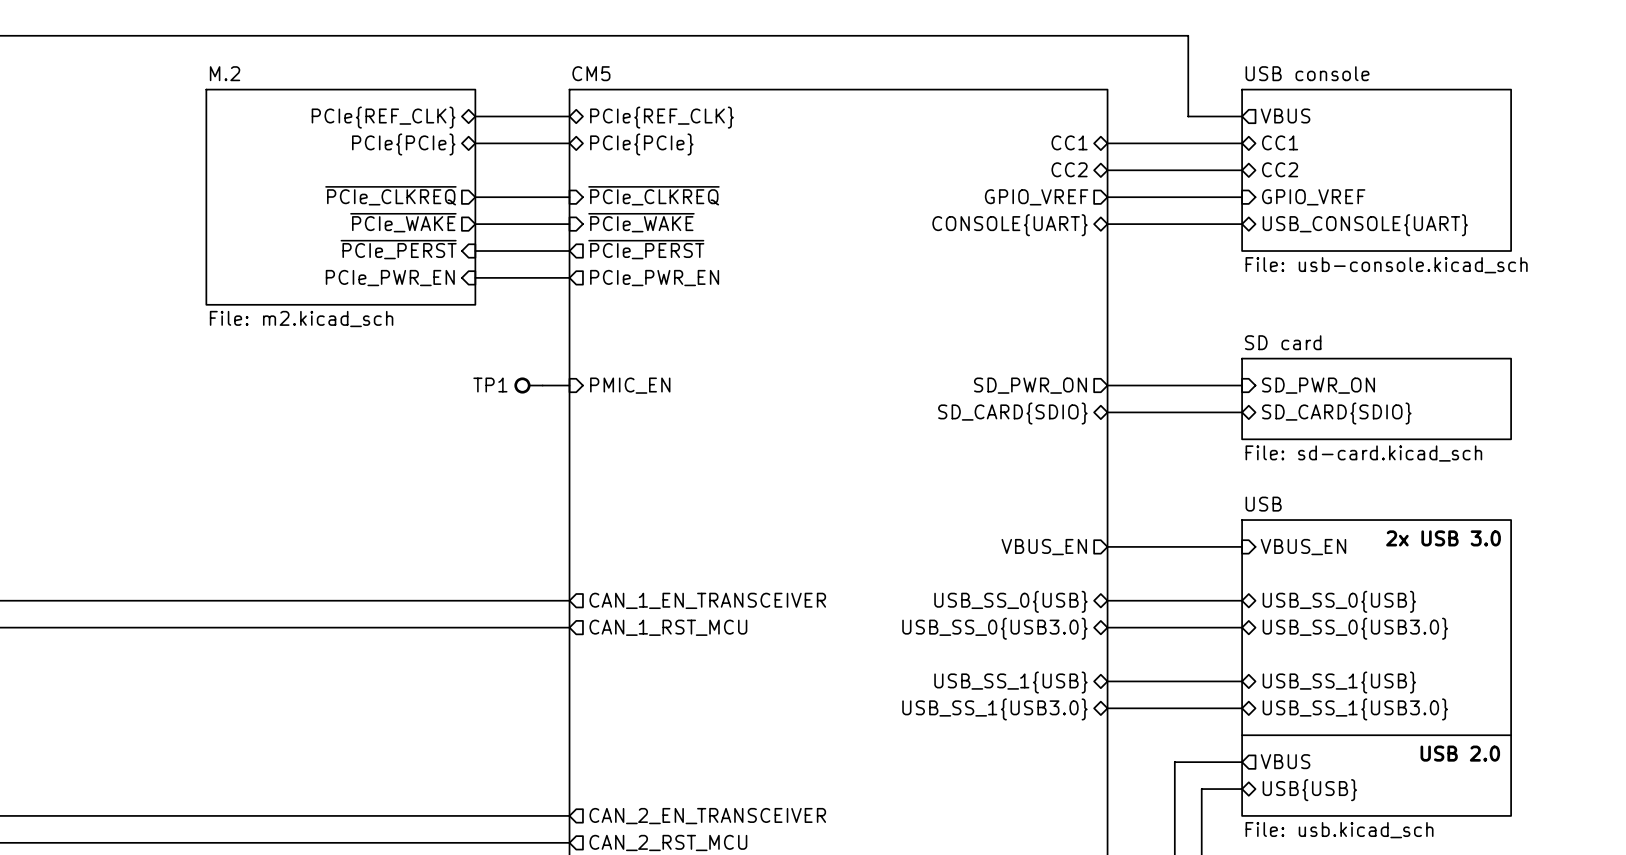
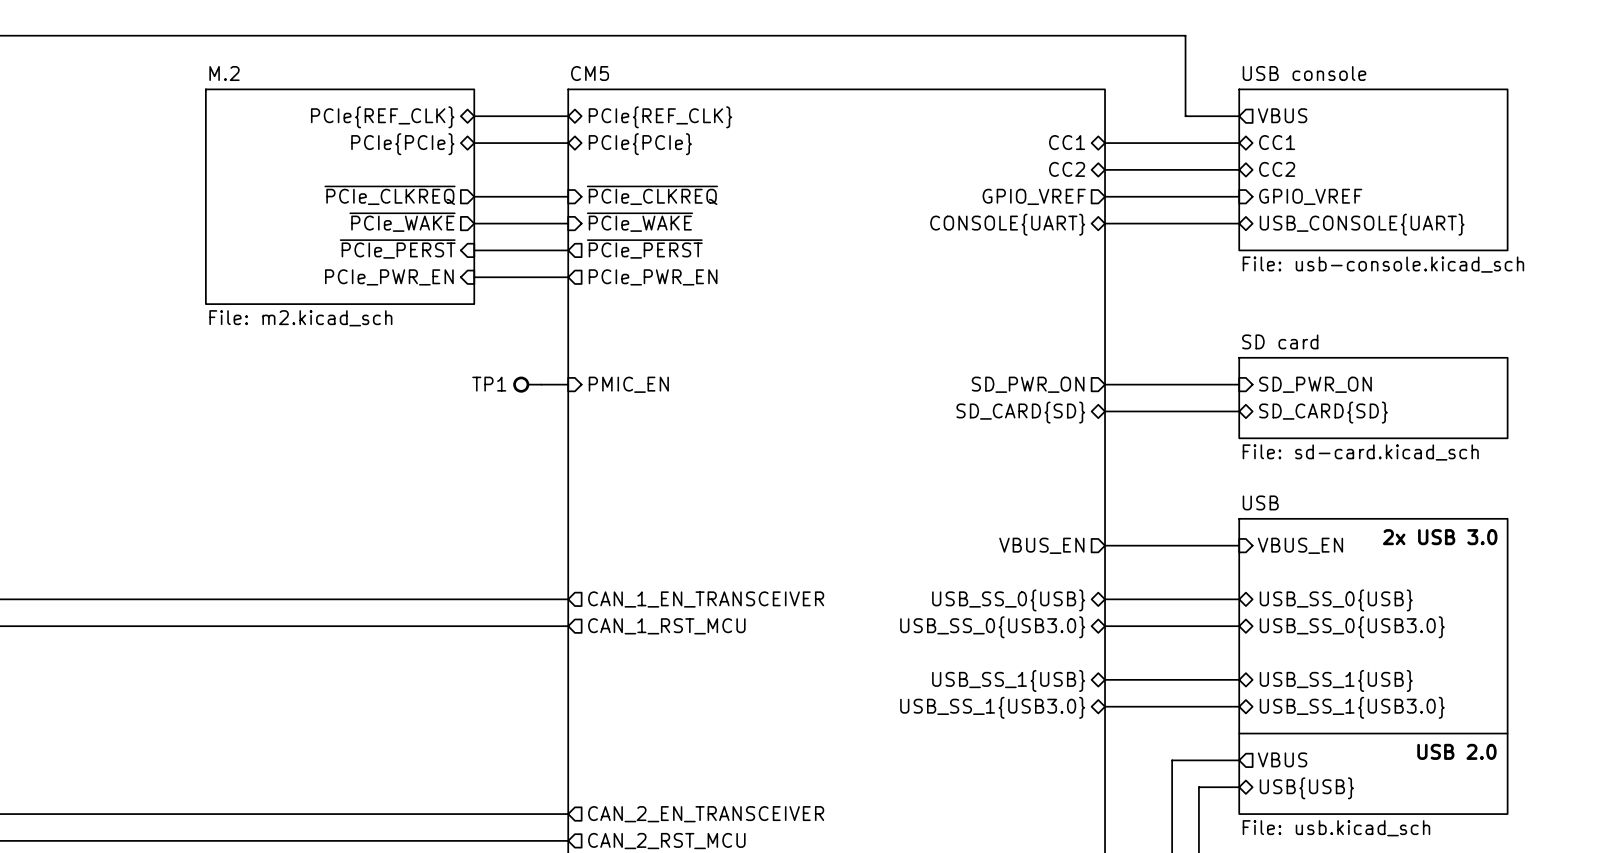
sheet pin: SD_CARD{SDIO} (1012, 413) -> SD_CARD{SD} (1020, 412)
sheet pin: SD_CARD{SDIO} (1336, 413) -> SD_CARD{SD} (1323, 412)

